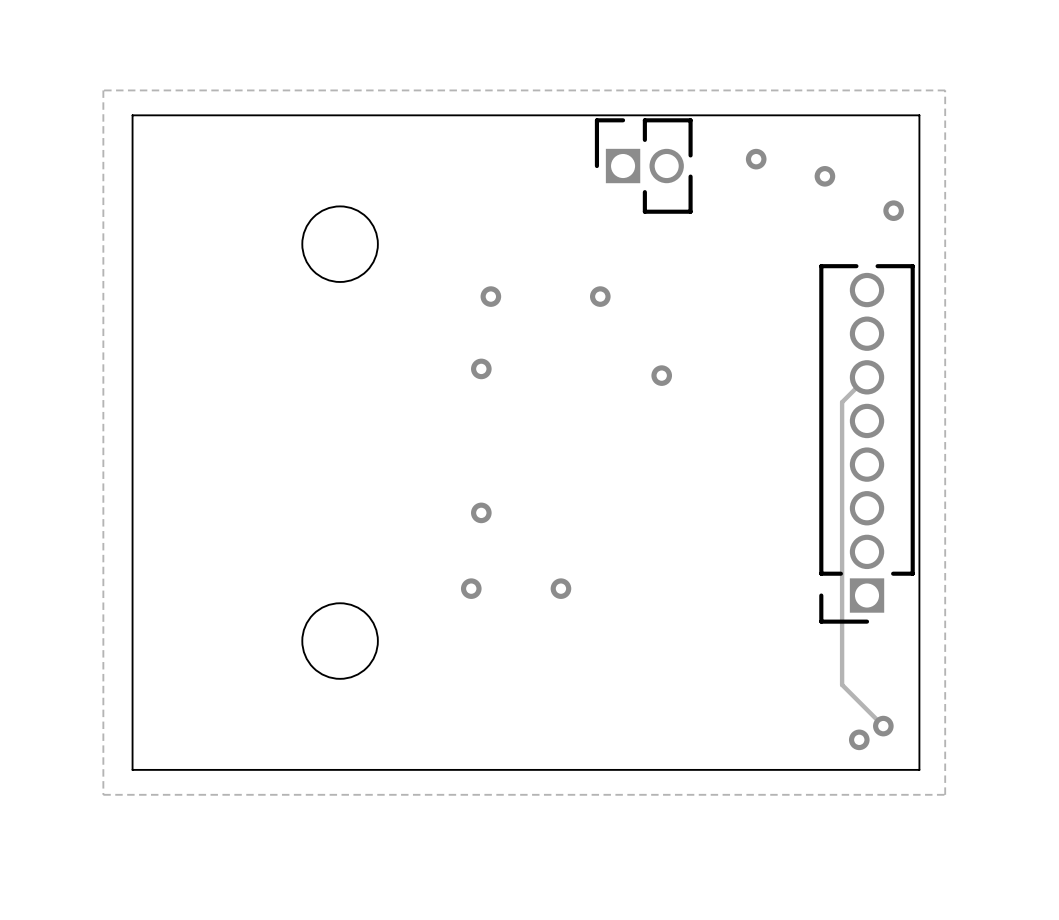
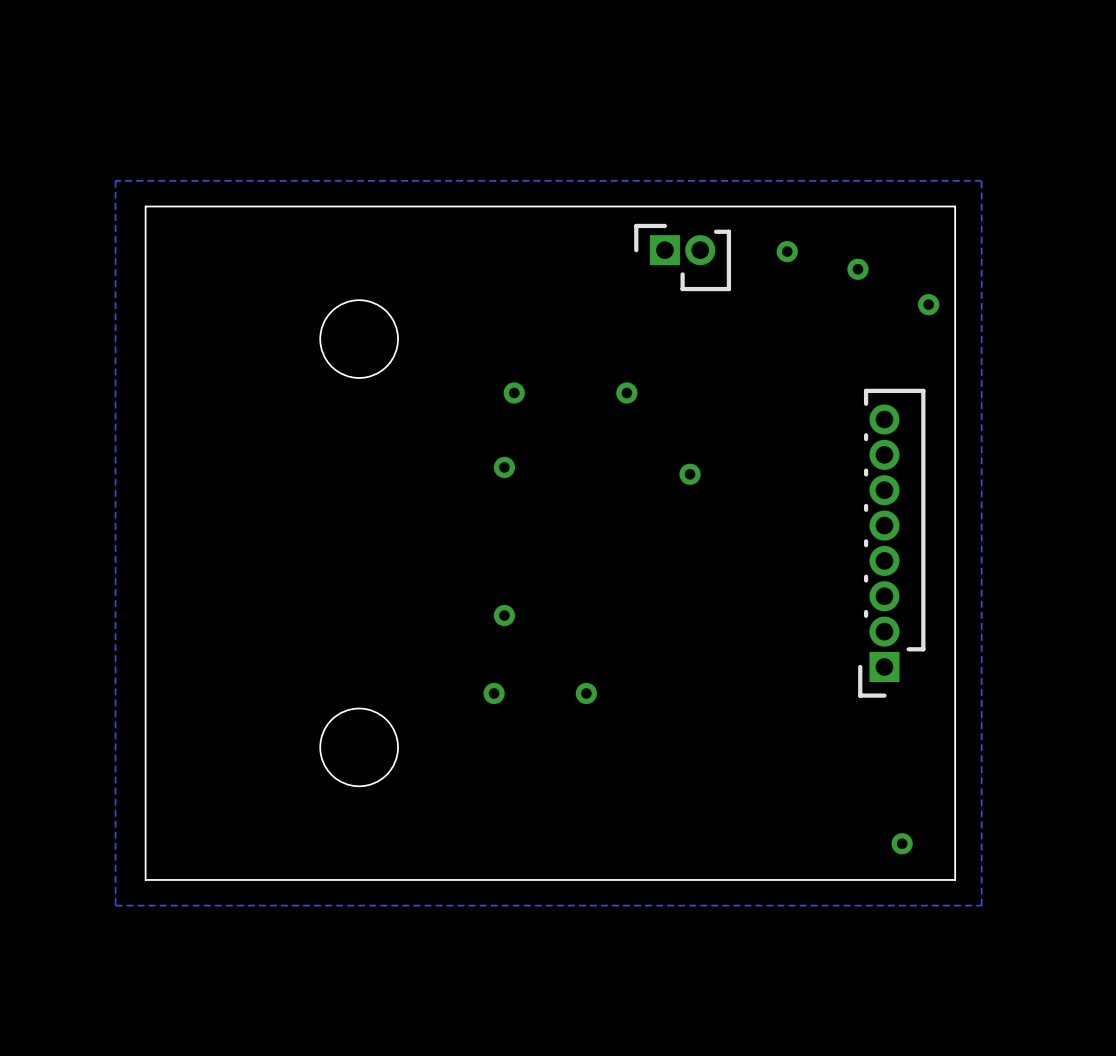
part footprint: [594, 118, 693, 214] -> [634, 223, 732, 292]
part footprint: [819, 264, 915, 624] -> [858, 388, 926, 698]
track: (867, 377) (842, 402) (842, 684) (883, 726) -> none
via: (883, 726) -> none
via: none -> (902, 843)
via: (859, 739) -> none

